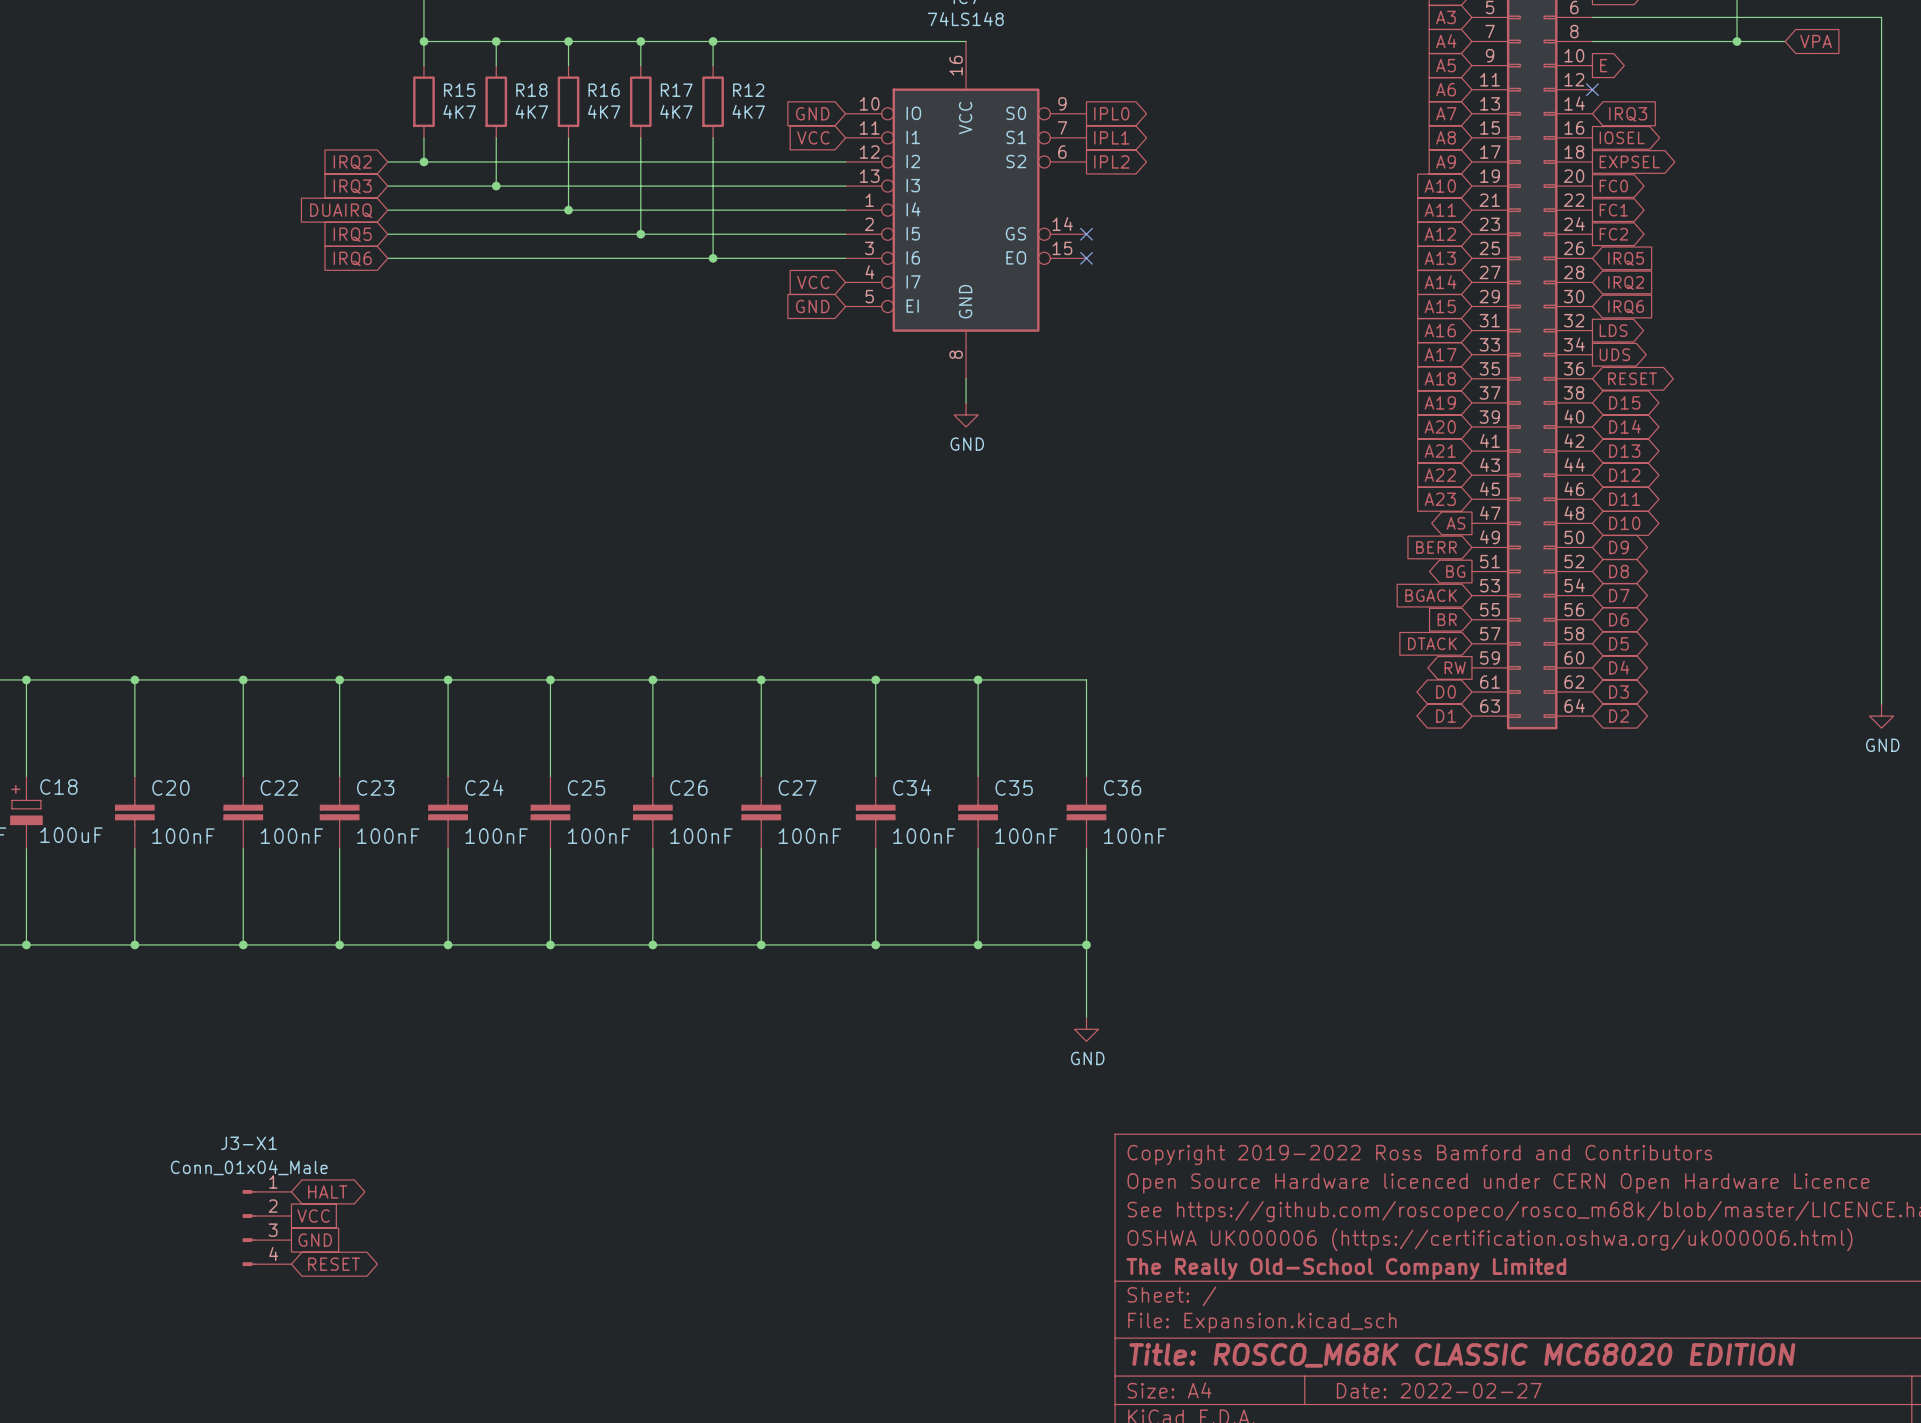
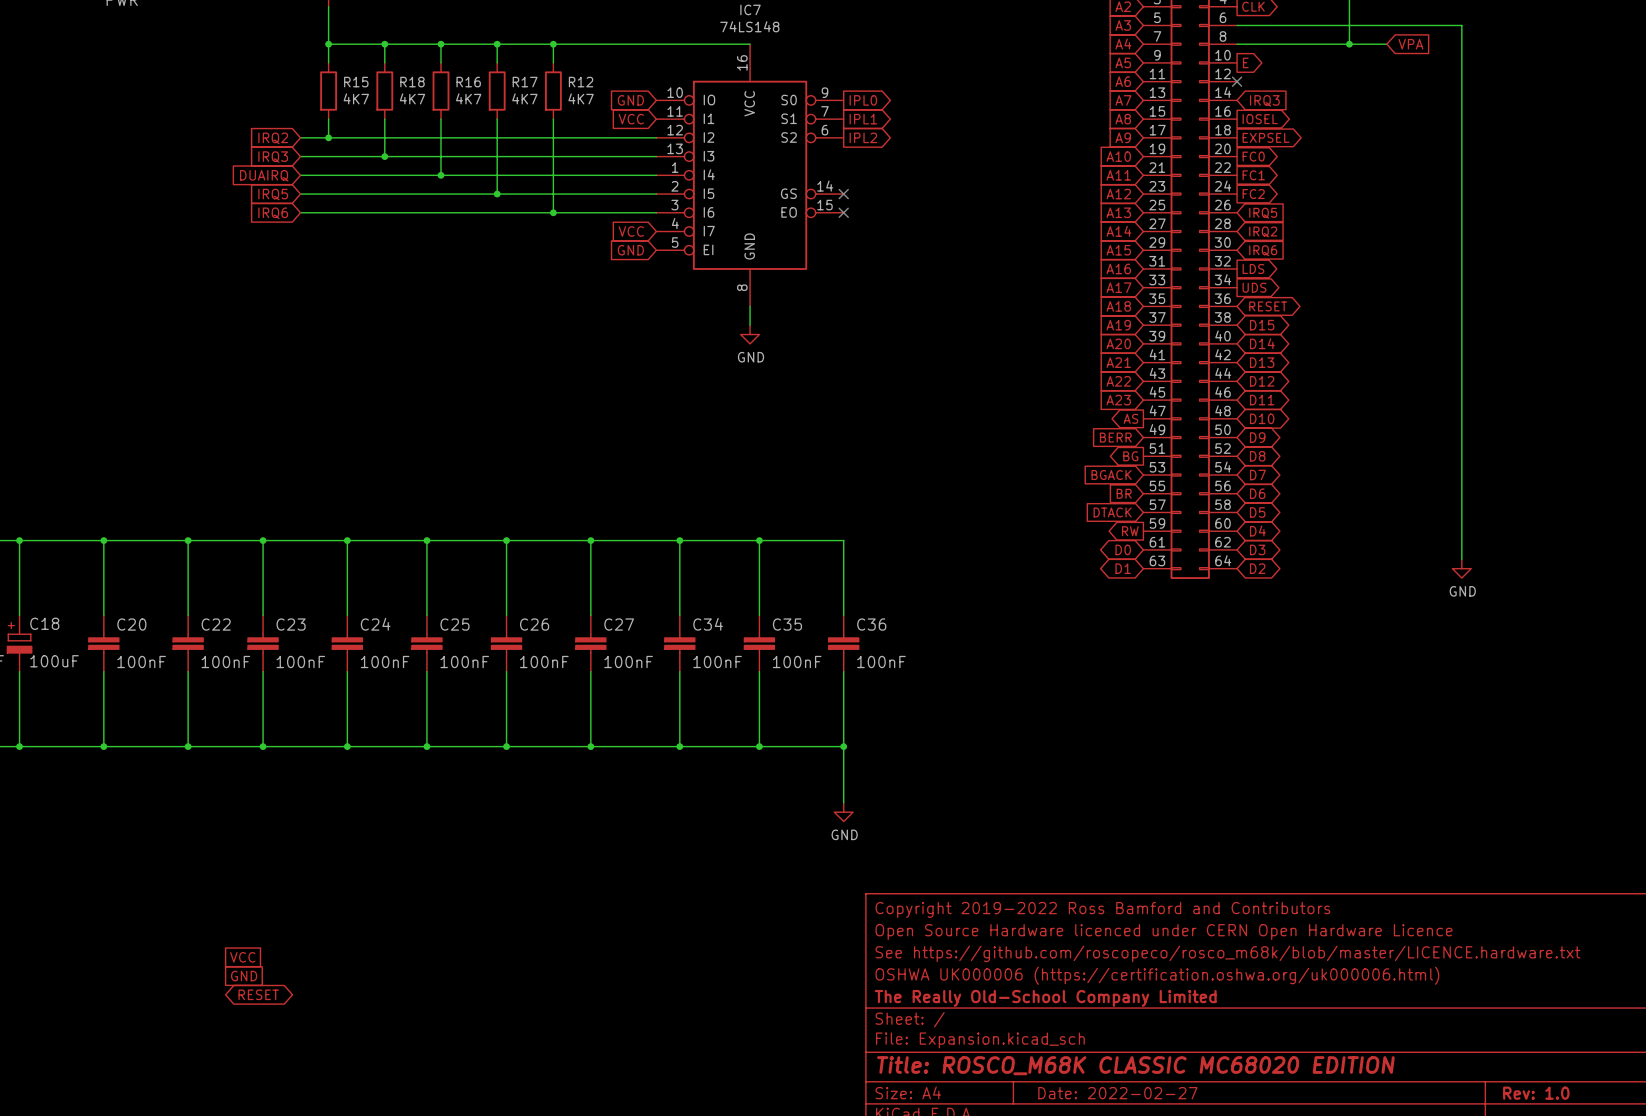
global label: HALT (327, 1191) -> none
J3-X1: Conn_01x04_Male (267, 1228) -> none

